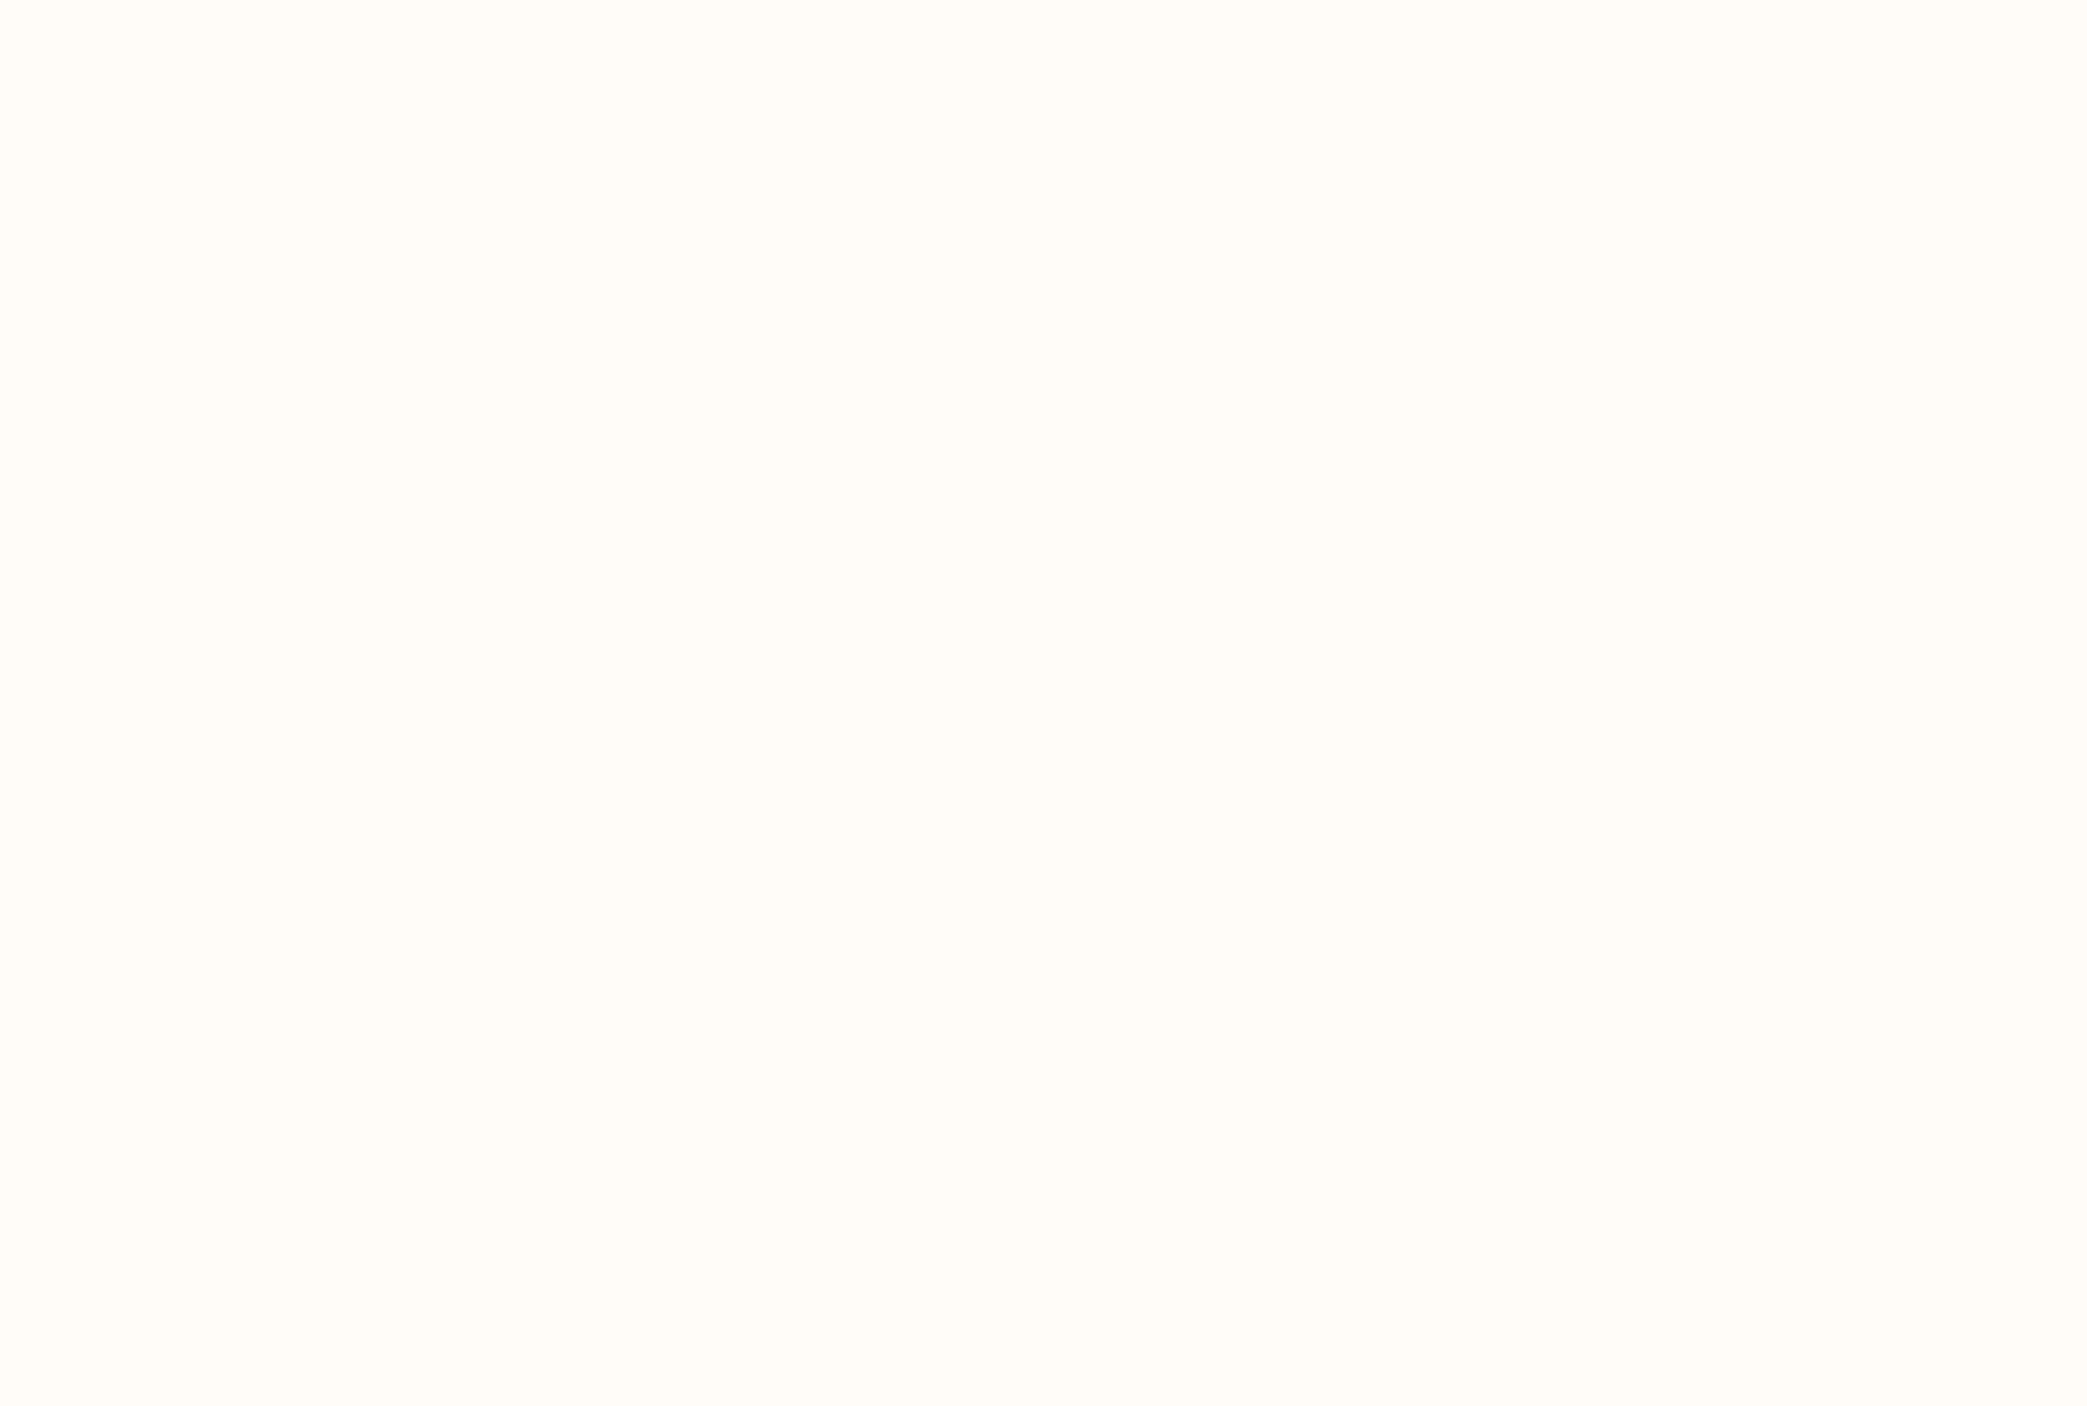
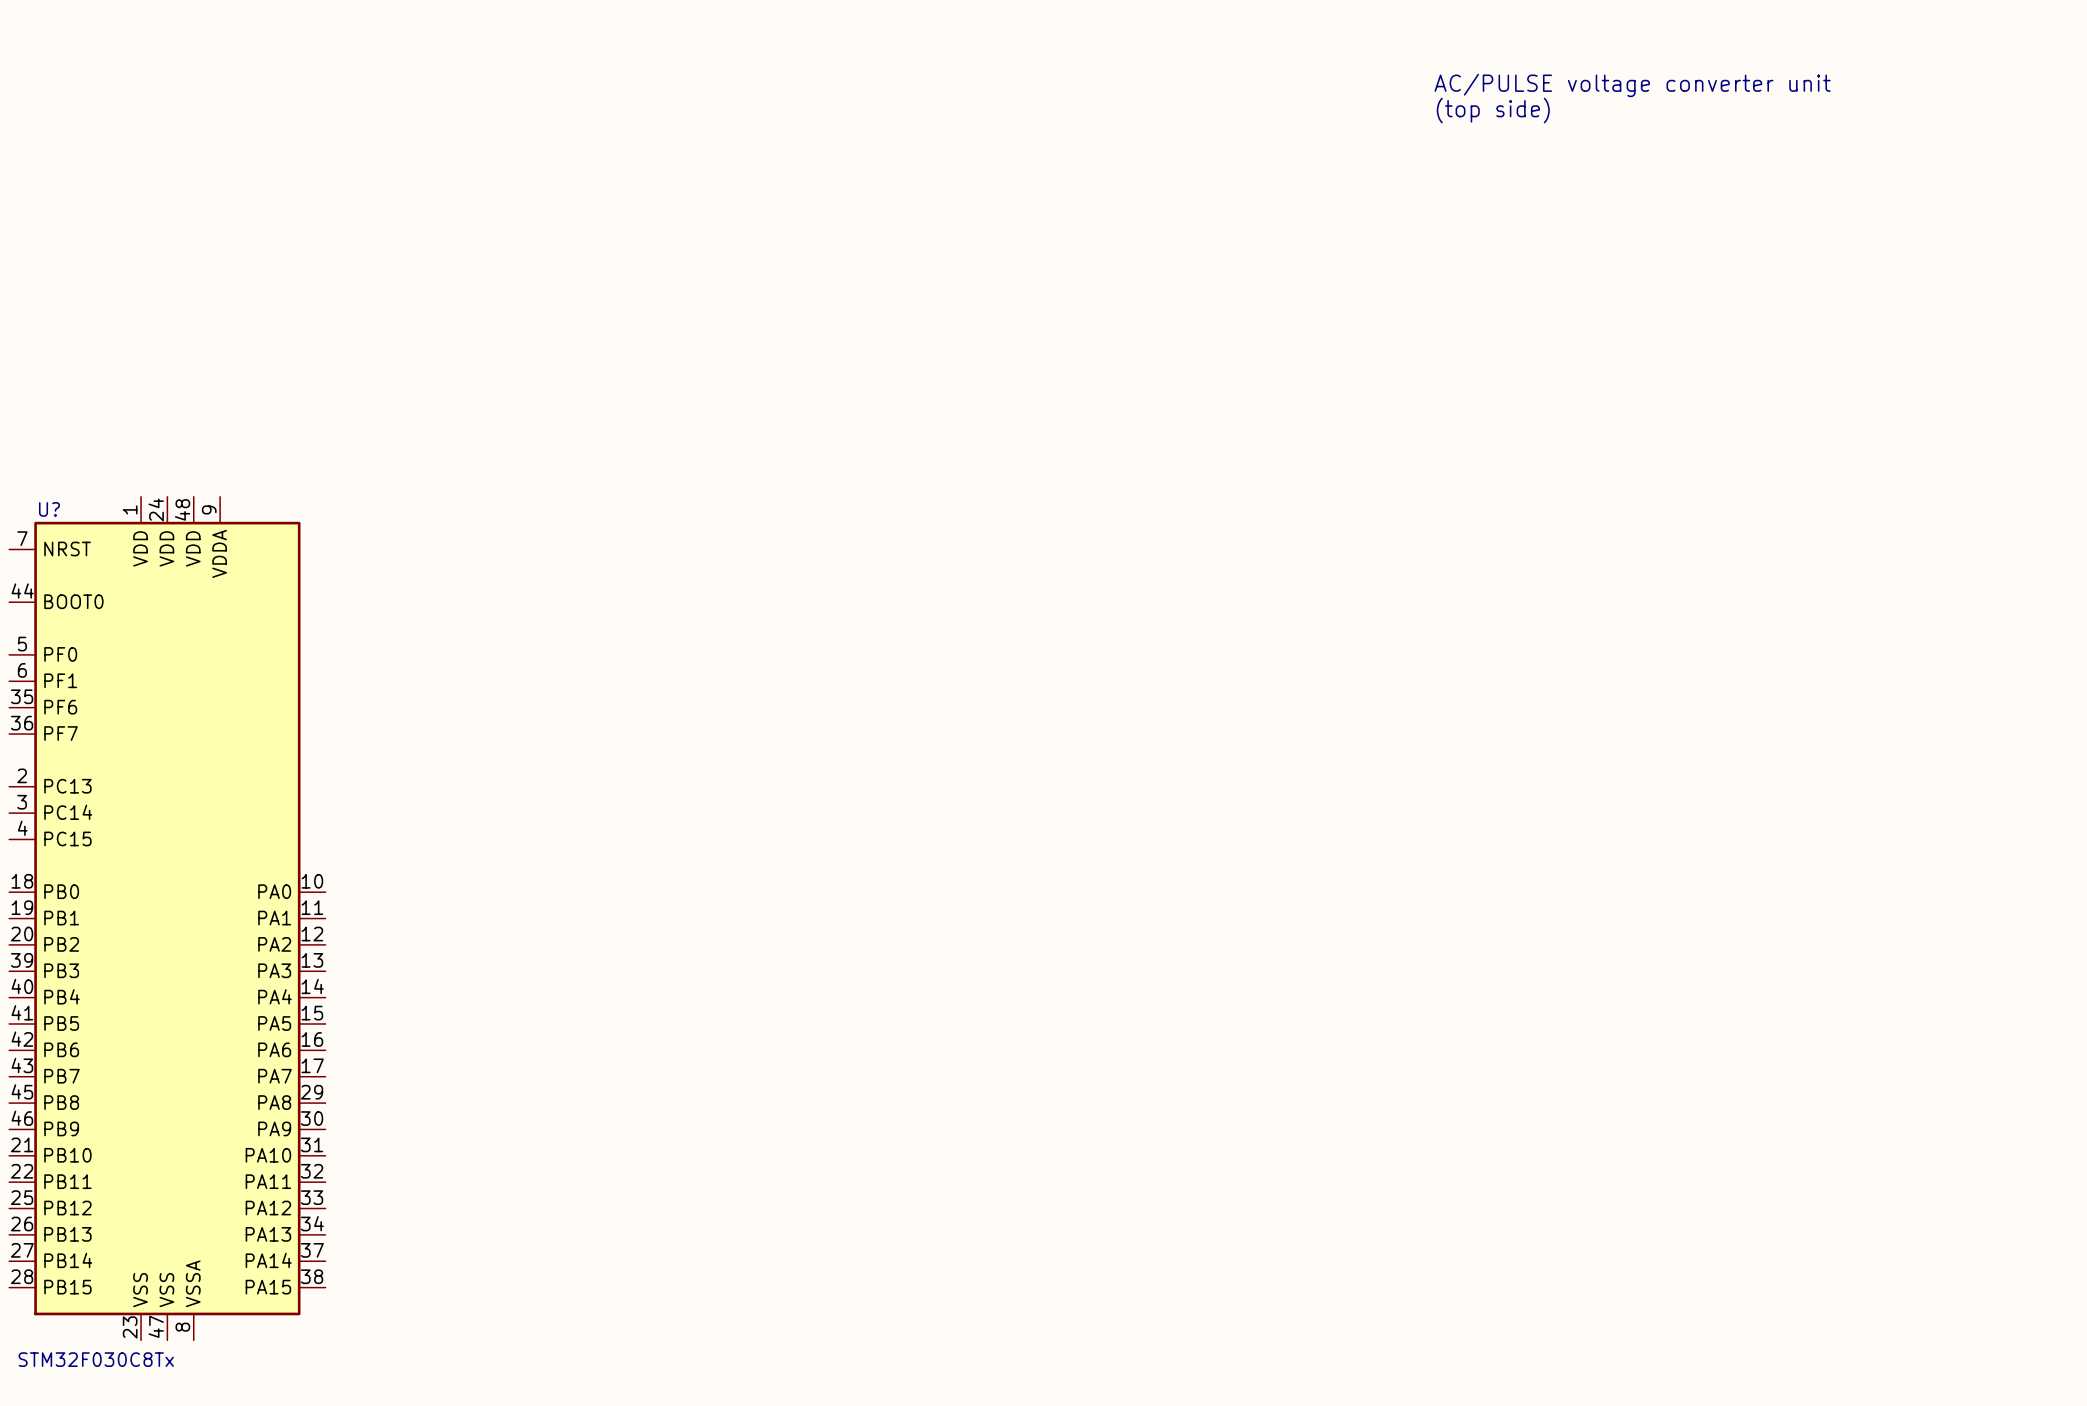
text: none -> AC/PULSE voltage converter unit (1632, 85)
text: none -> (top side) (1493, 110)
U?: none -> STM32F030C8Tx (167, 918)

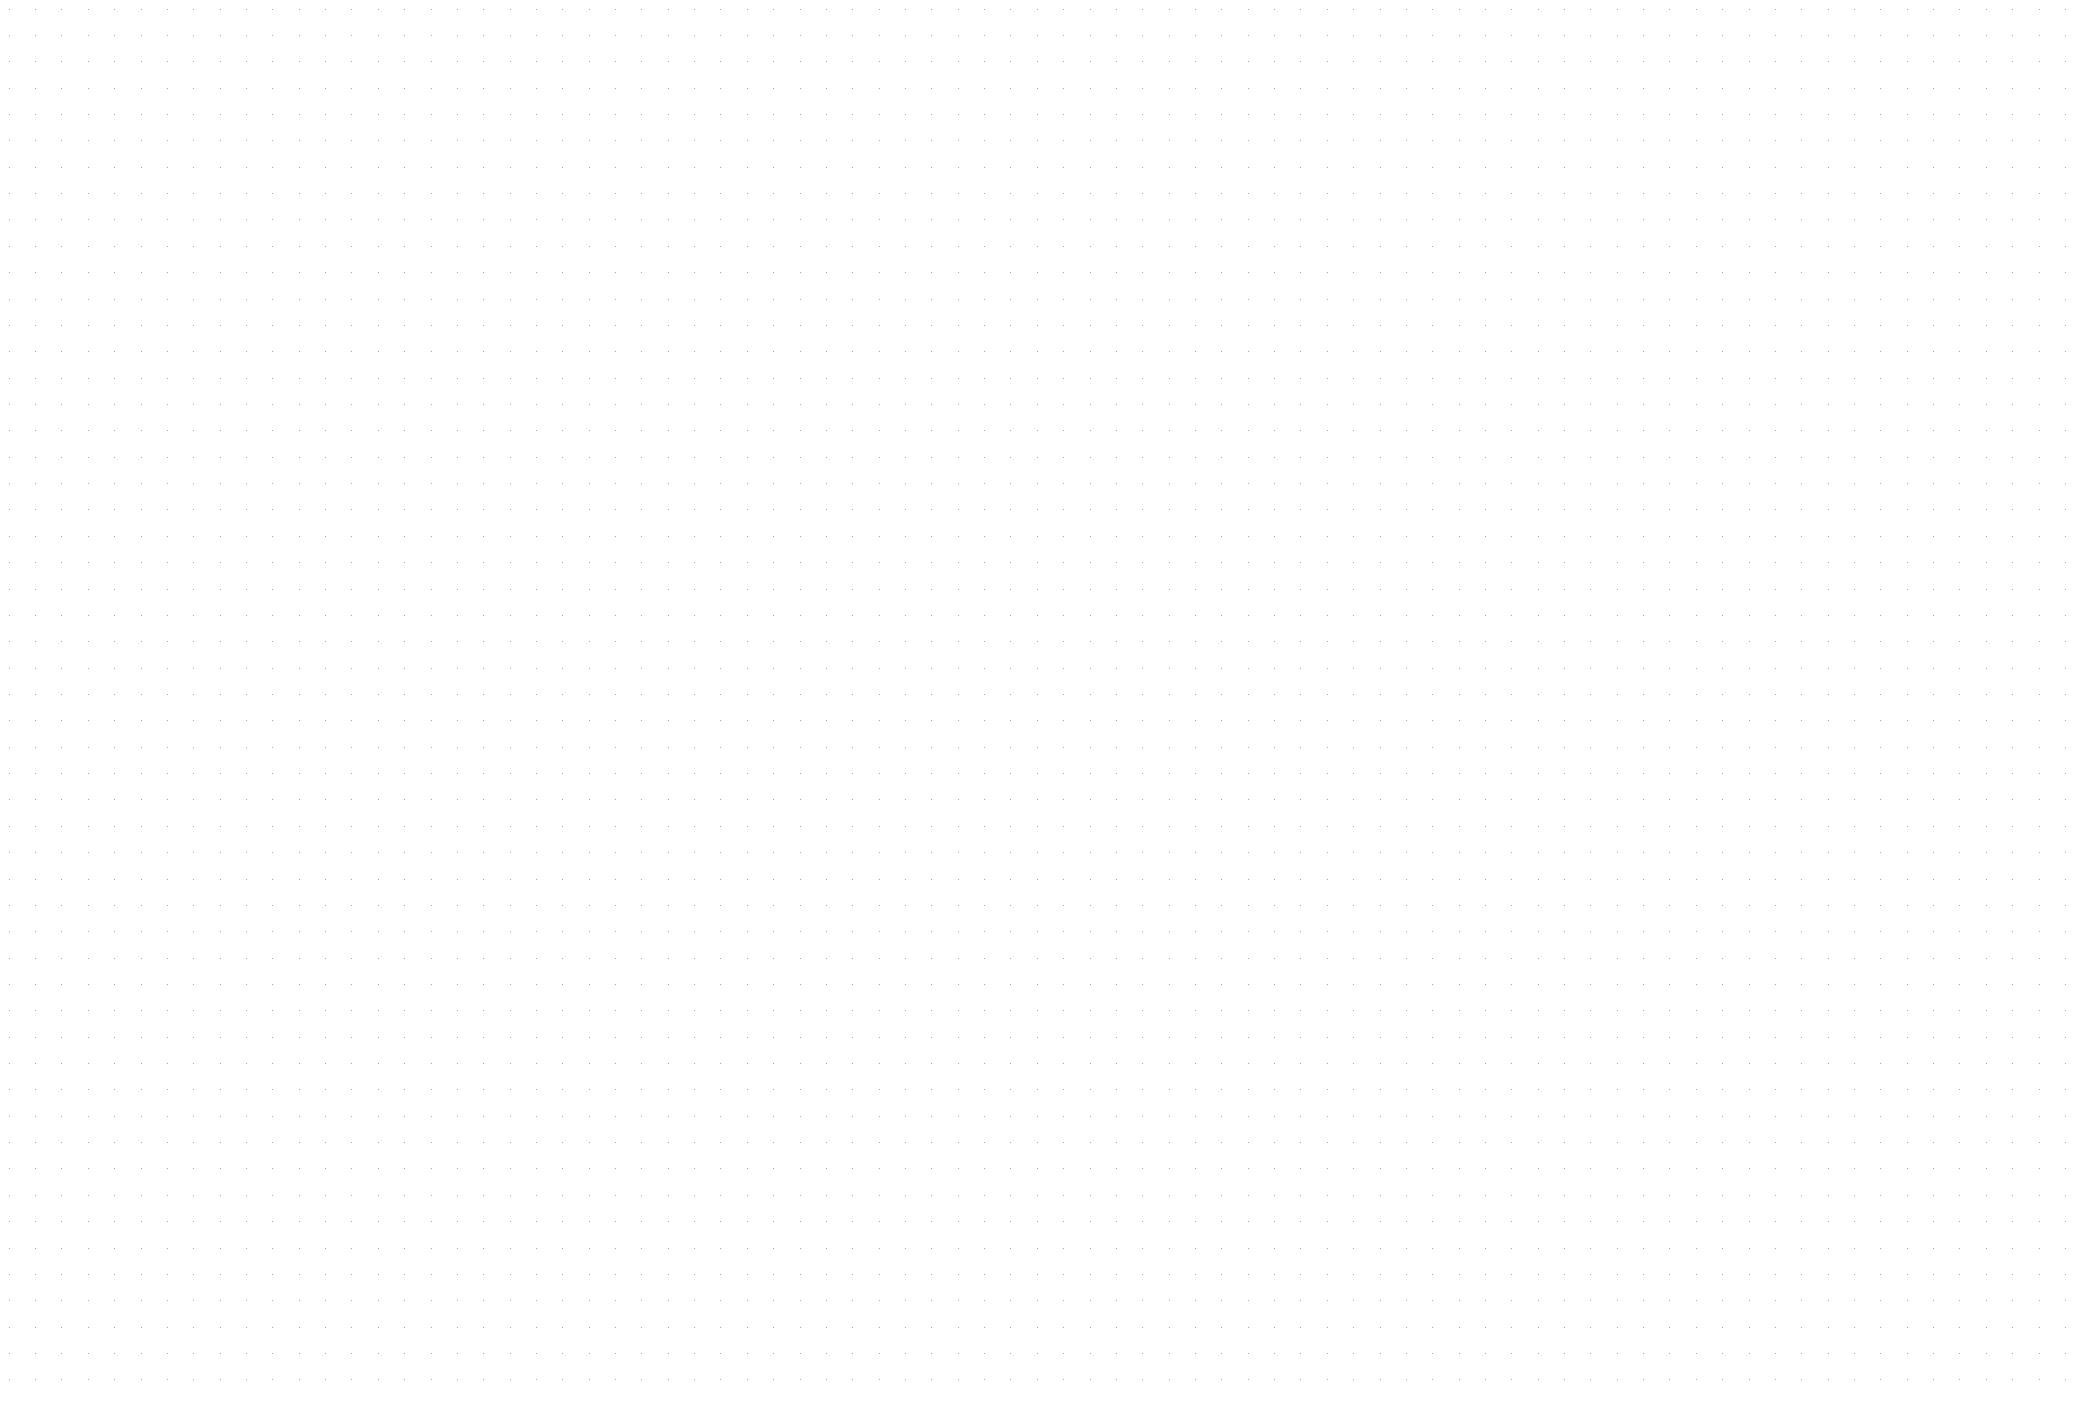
text: AC/PULSE voltage converter unit (1632, 85) -> none
text: (top side) (1493, 110) -> none
U?: STM32F030C8Tx (167, 918) -> none

